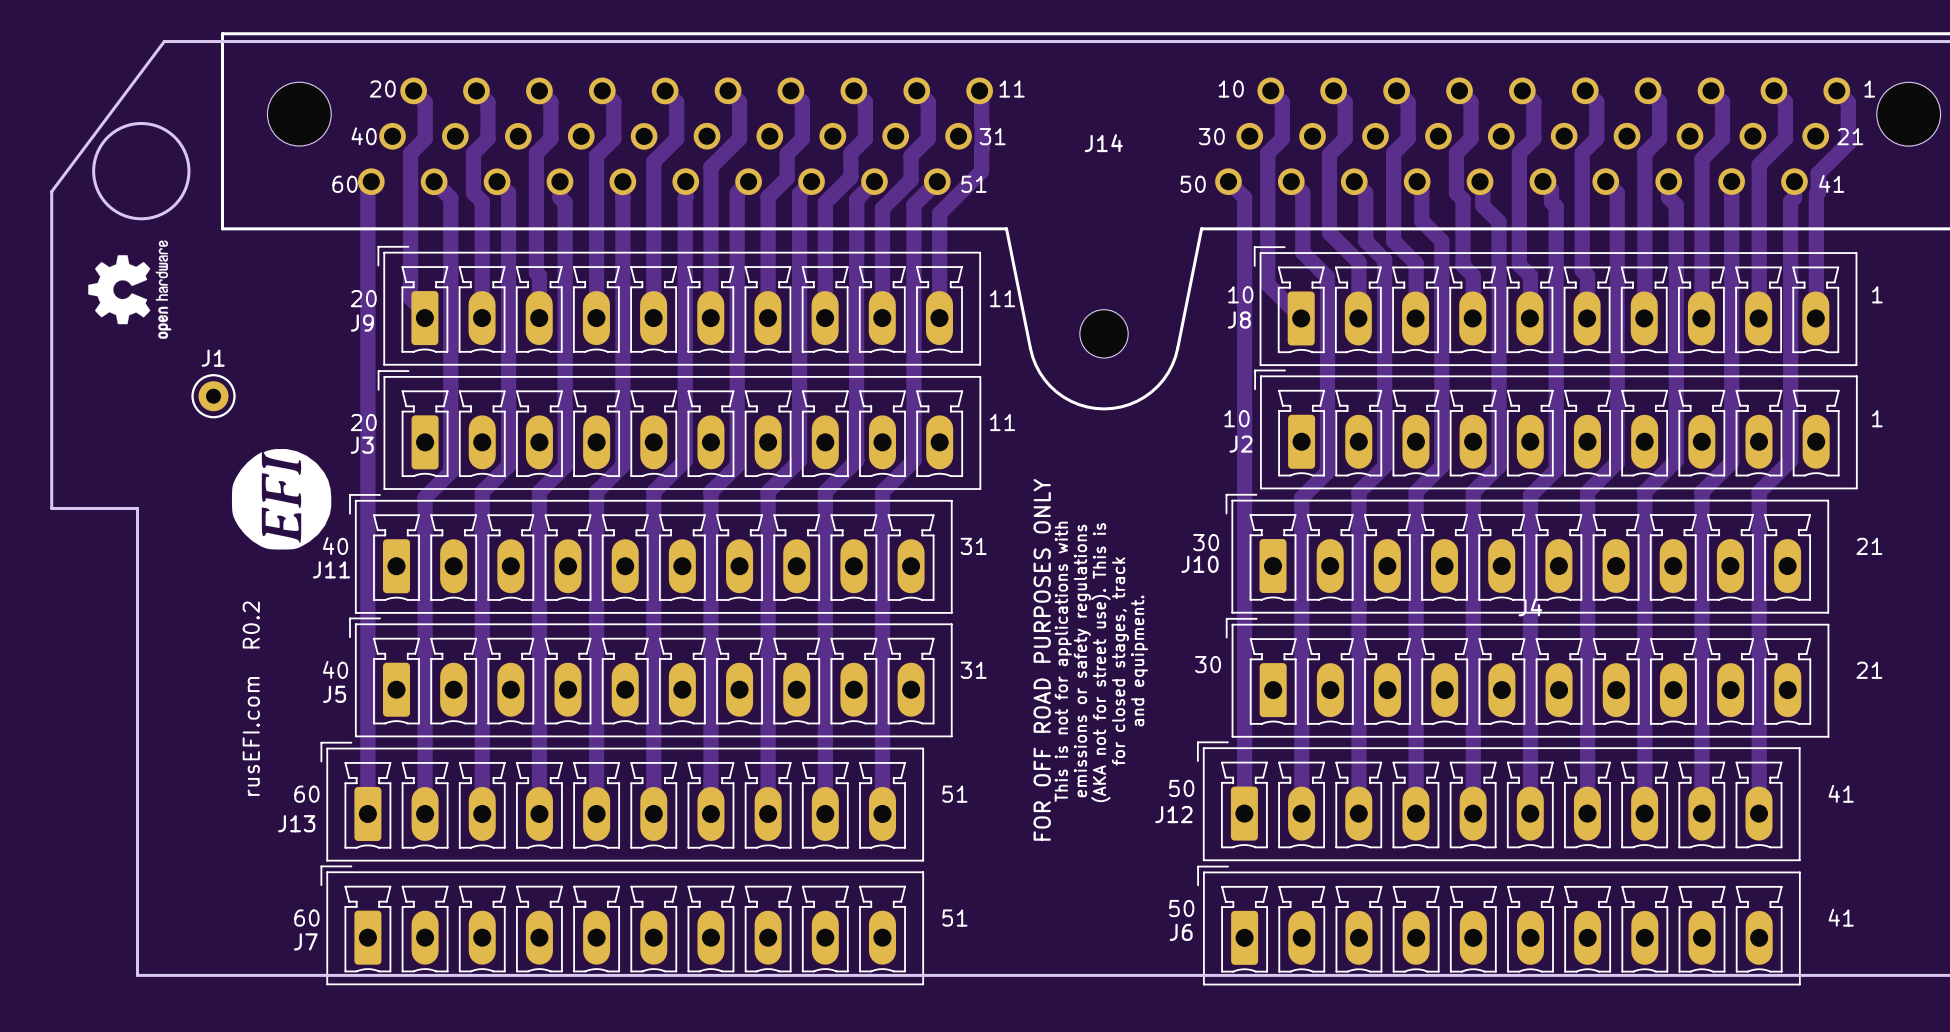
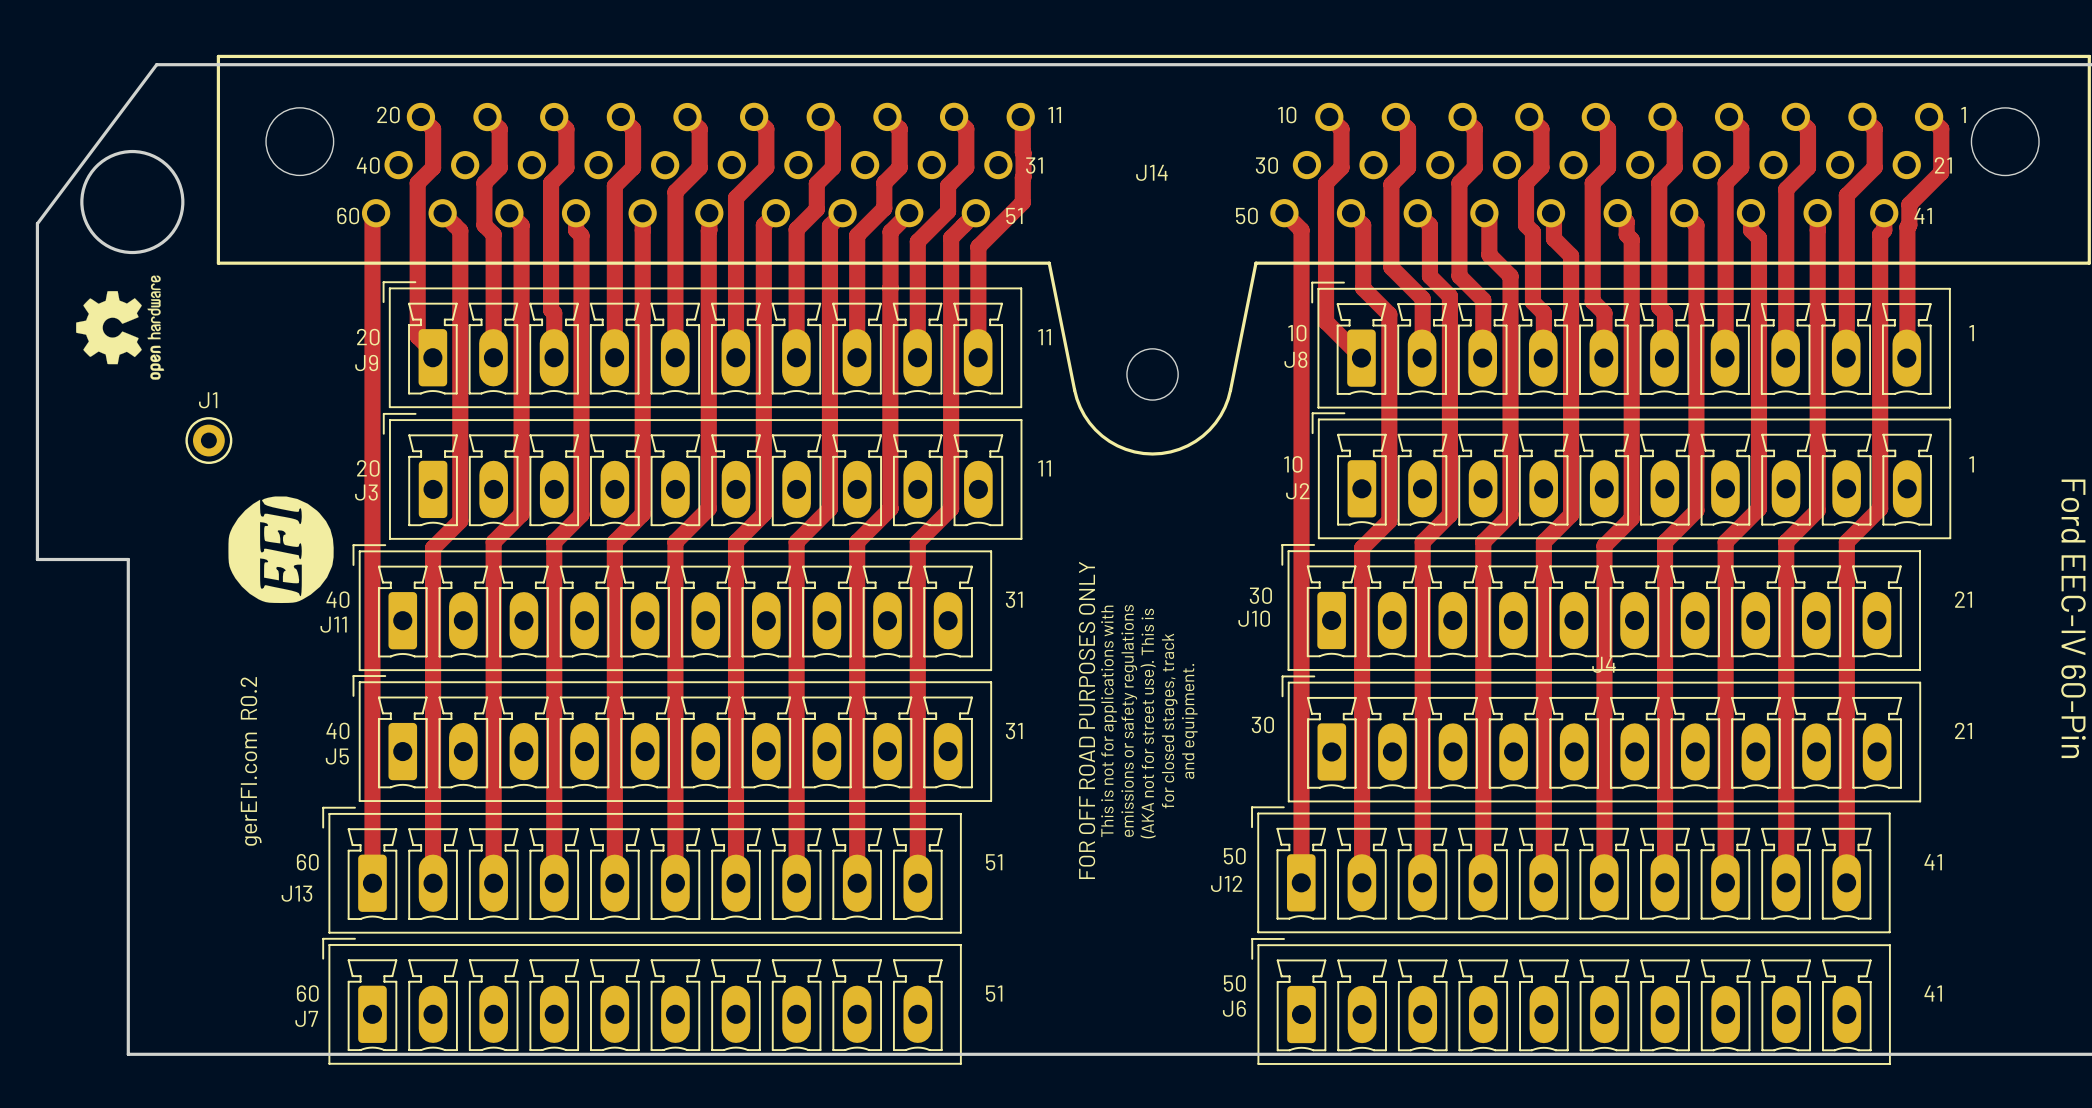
text: rusEFI.com R0.2 (251, 698) -> gerEFI.com R0.2 (251, 761)

